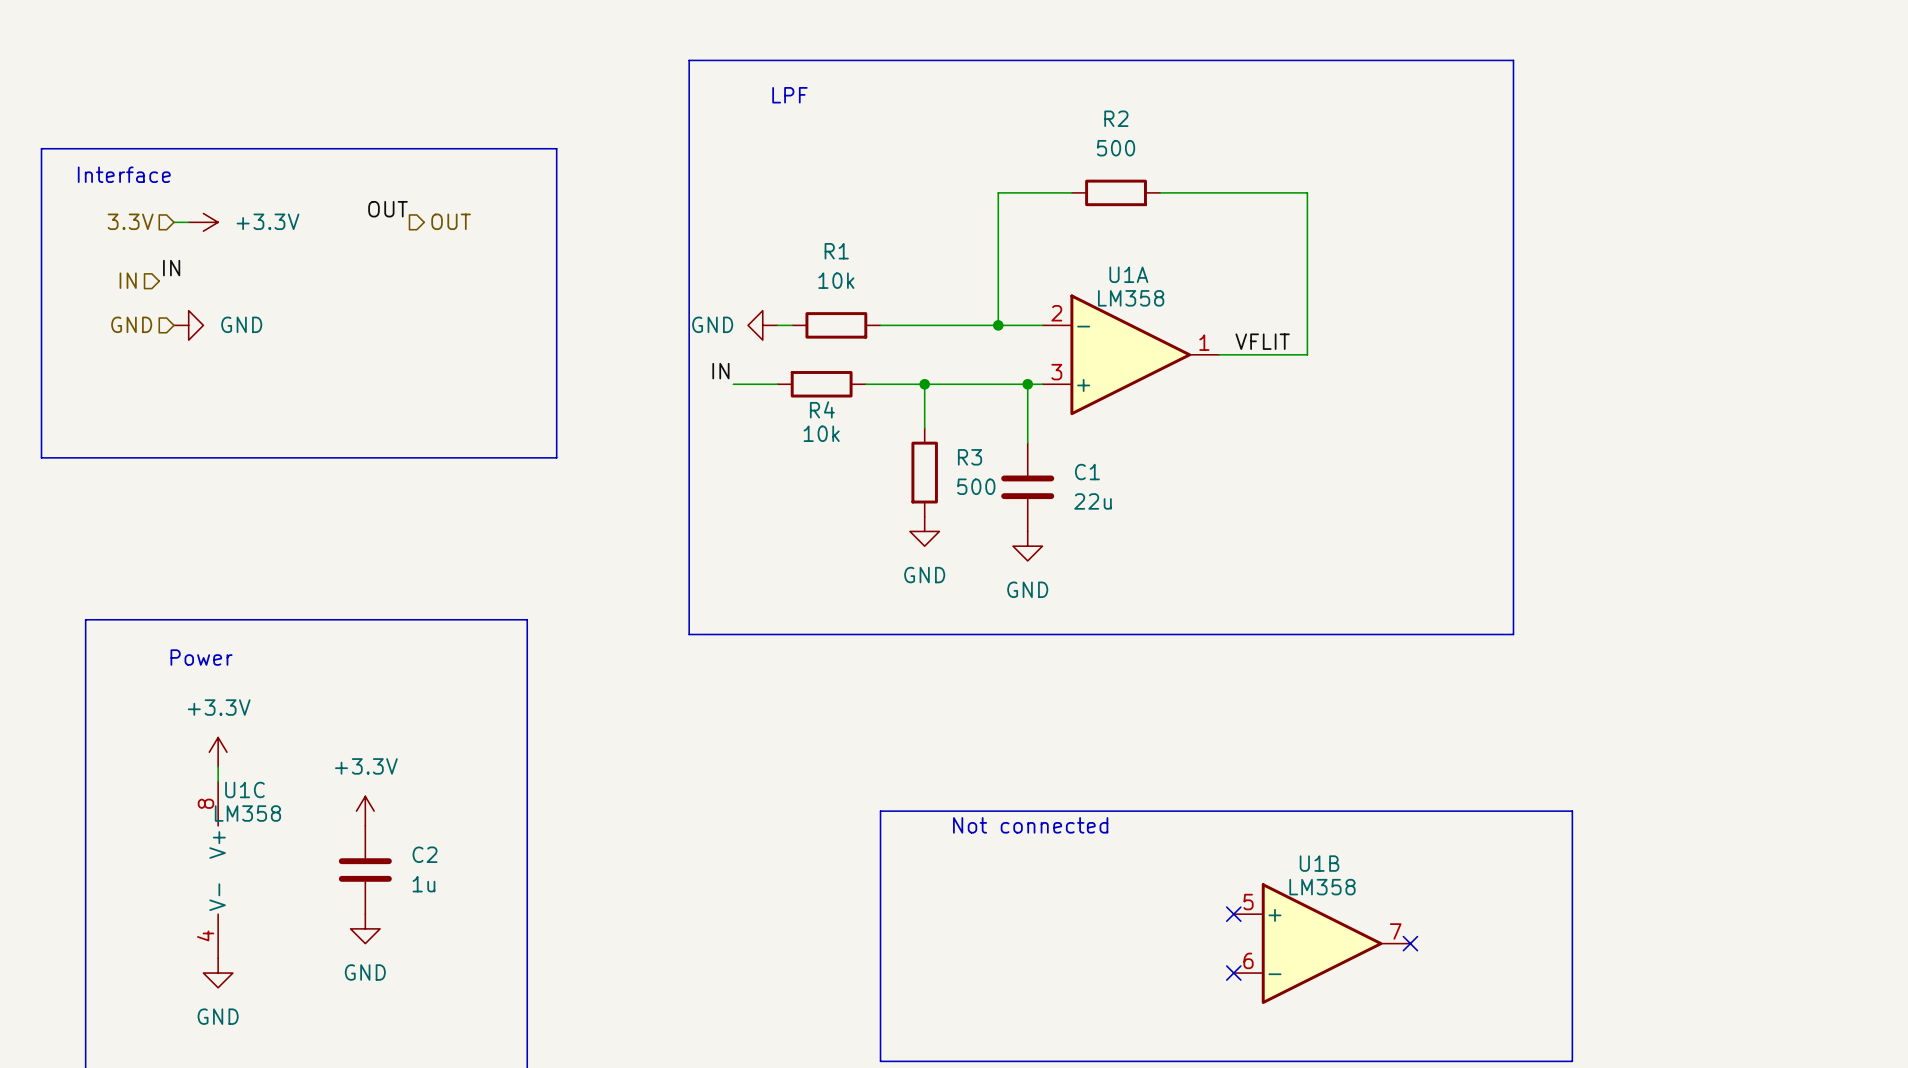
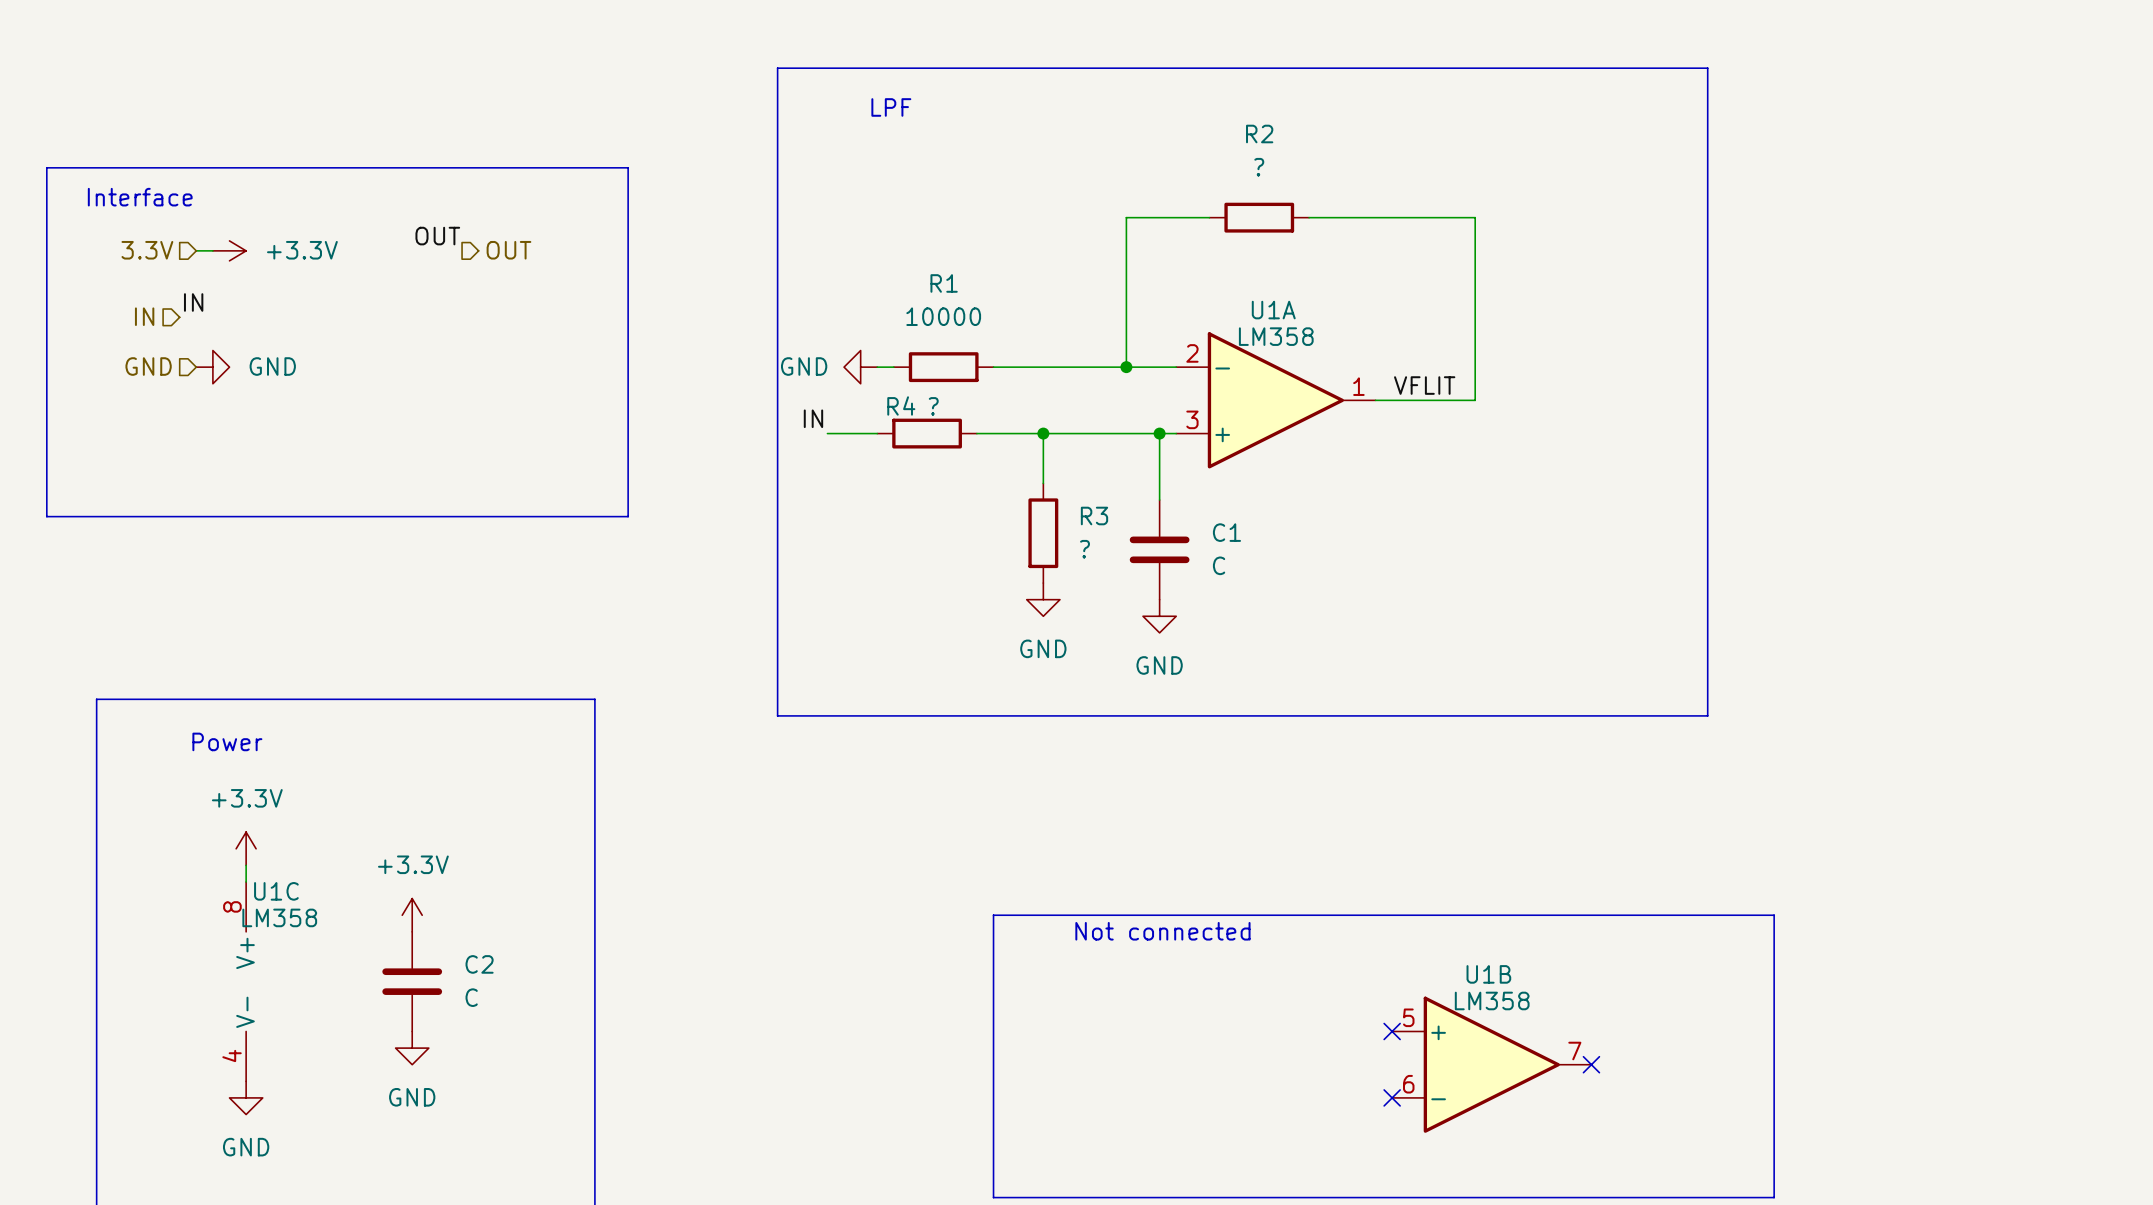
R2 value: 500 (1116, 148) -> ? (1259, 167)
R1 value: 10k (836, 280) -> 10000 (943, 316)
R4 name position: R4 (822, 409) -> R4 (901, 405)
R4 value: 10k (821, 433) -> ? (933, 406)
R3 value: 500 (976, 486) -> ? (1085, 549)
C1 value: 22u (1093, 501) -> C (1219, 565)
C2 value: 1u (423, 884) -> C (471, 997)

